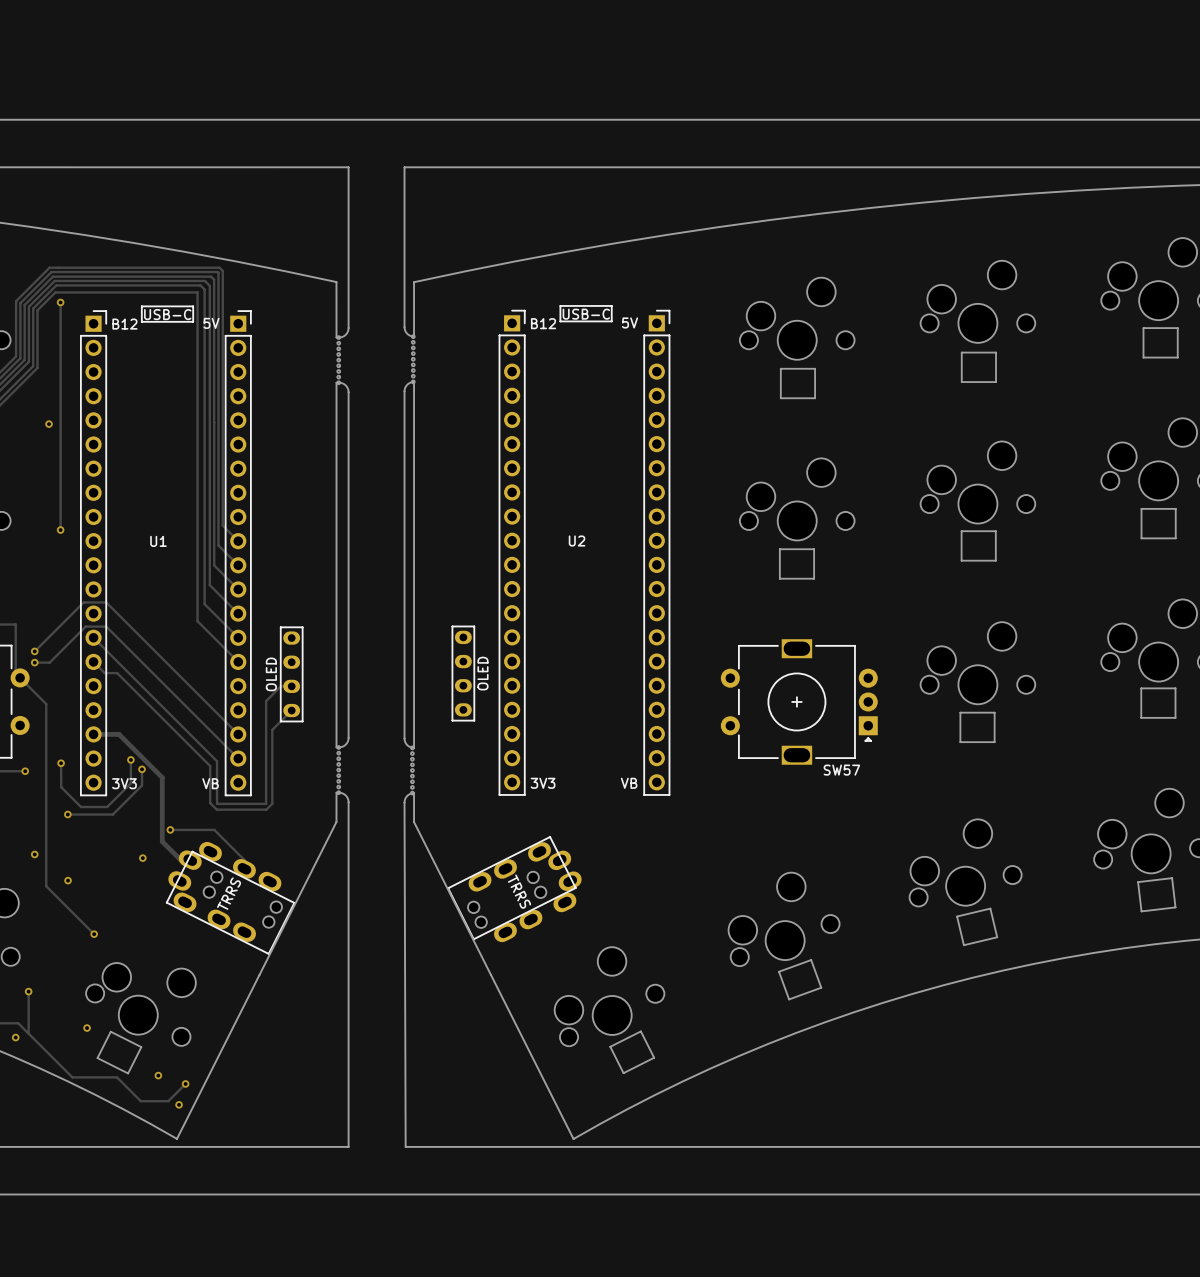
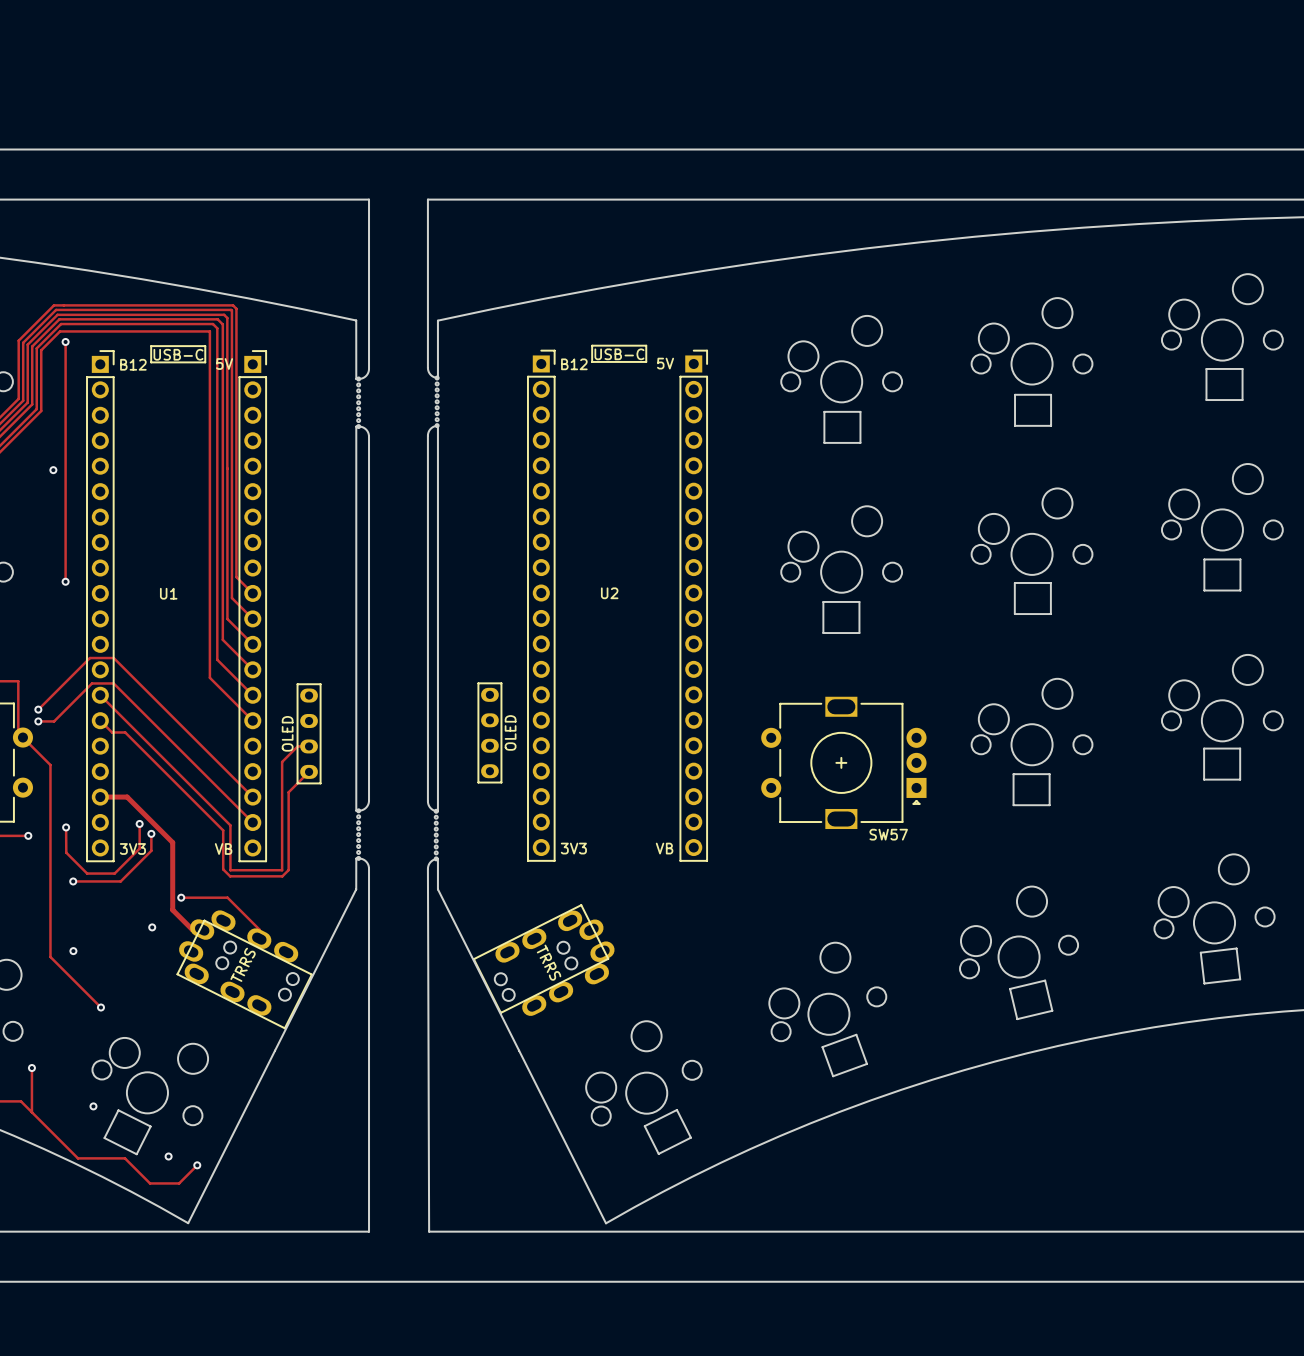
via: (34, 854) -> none
via: (15, 1037) -> none
via: (179, 1104) -> none

